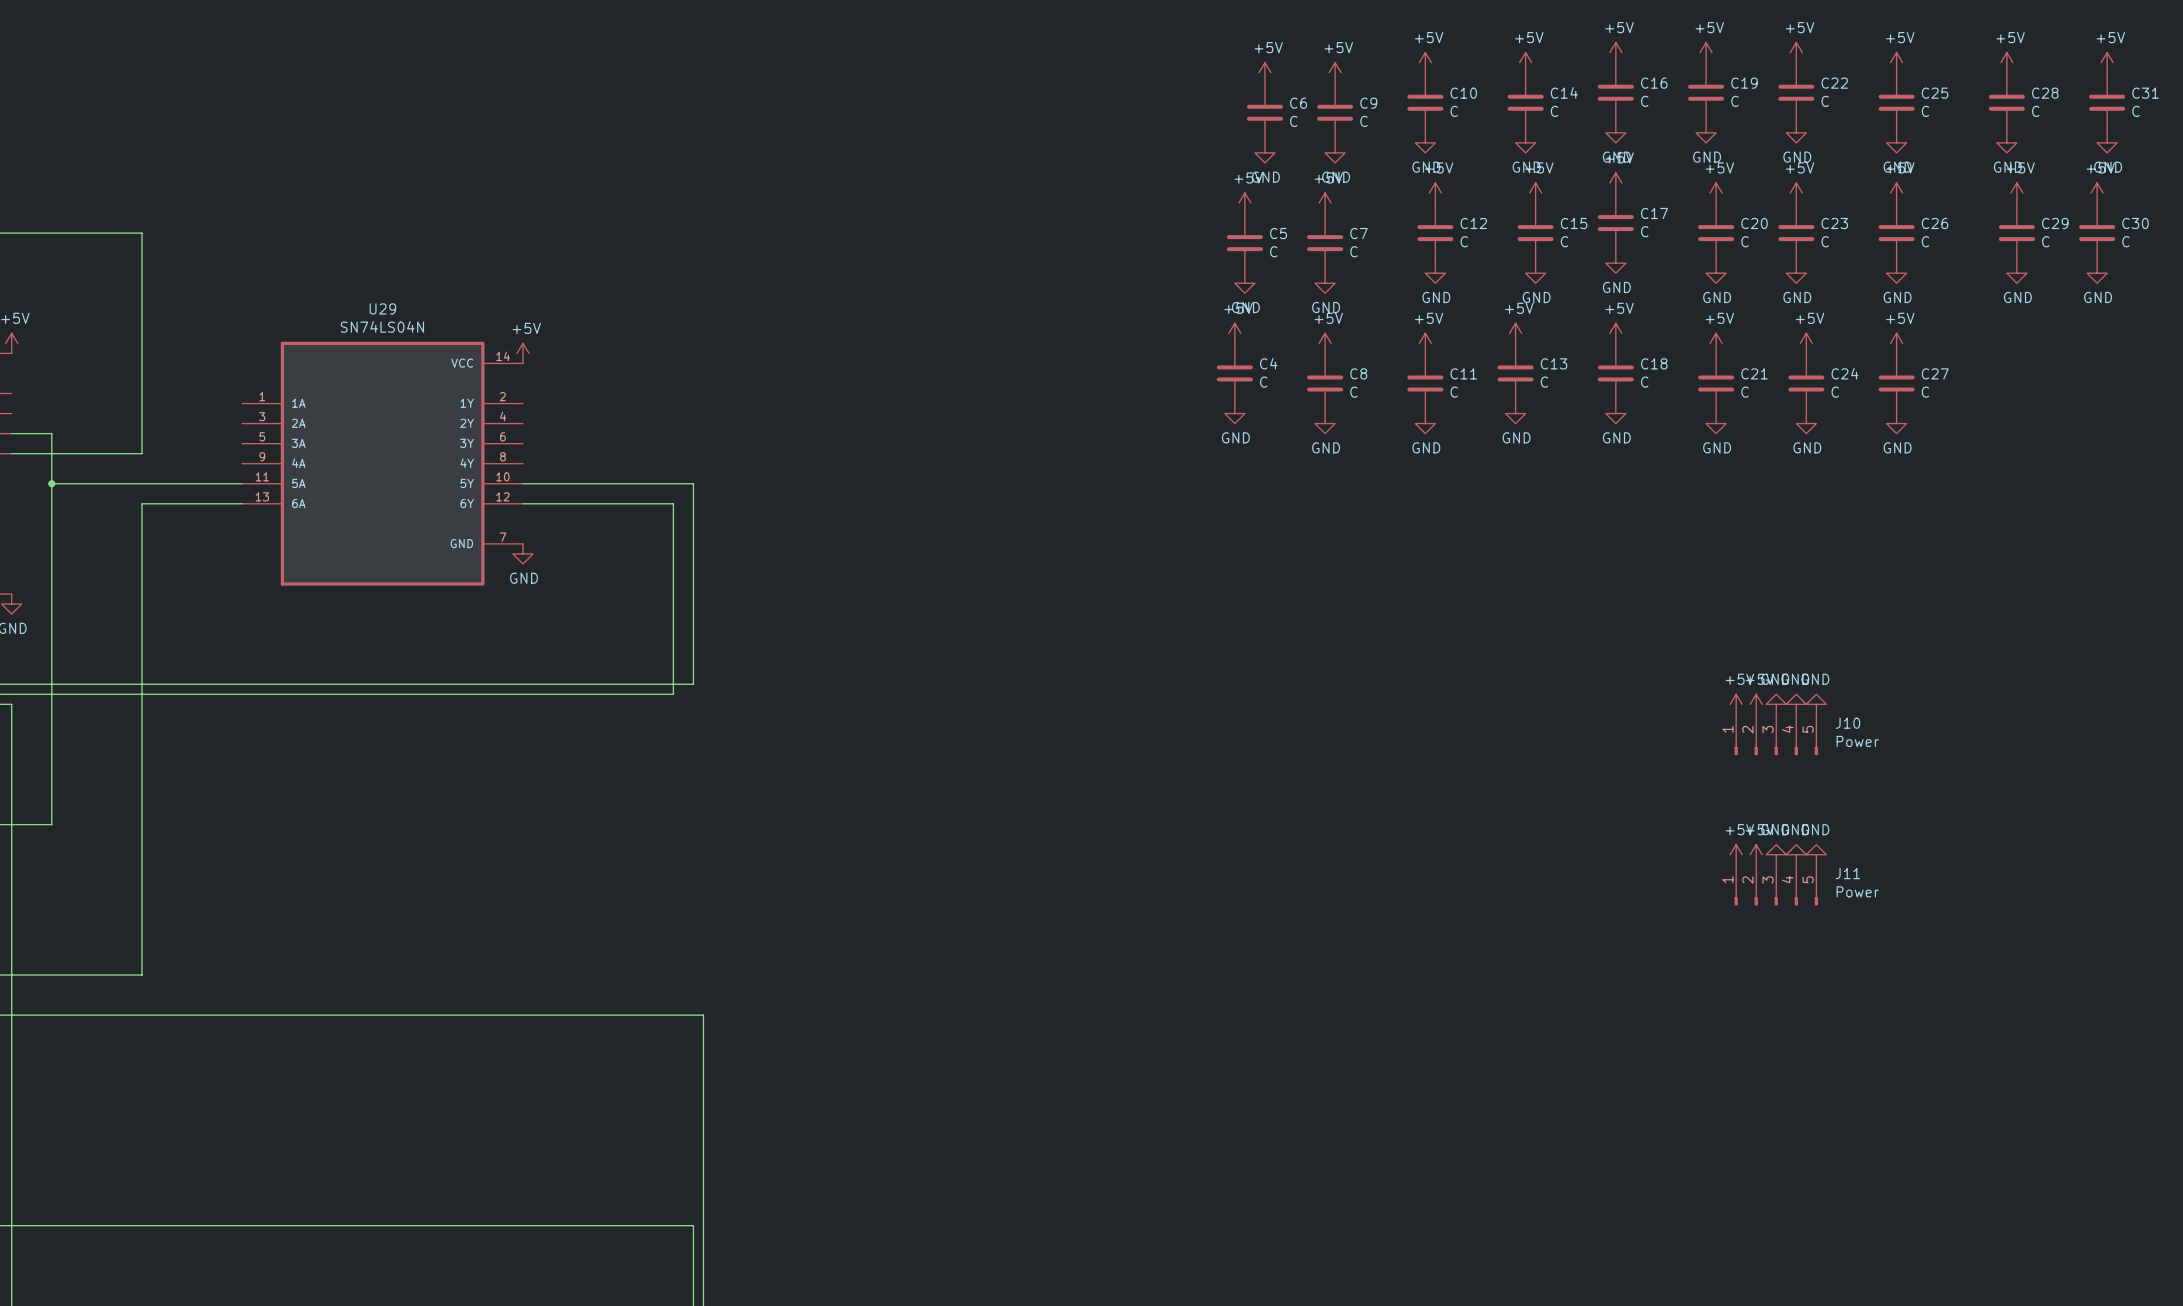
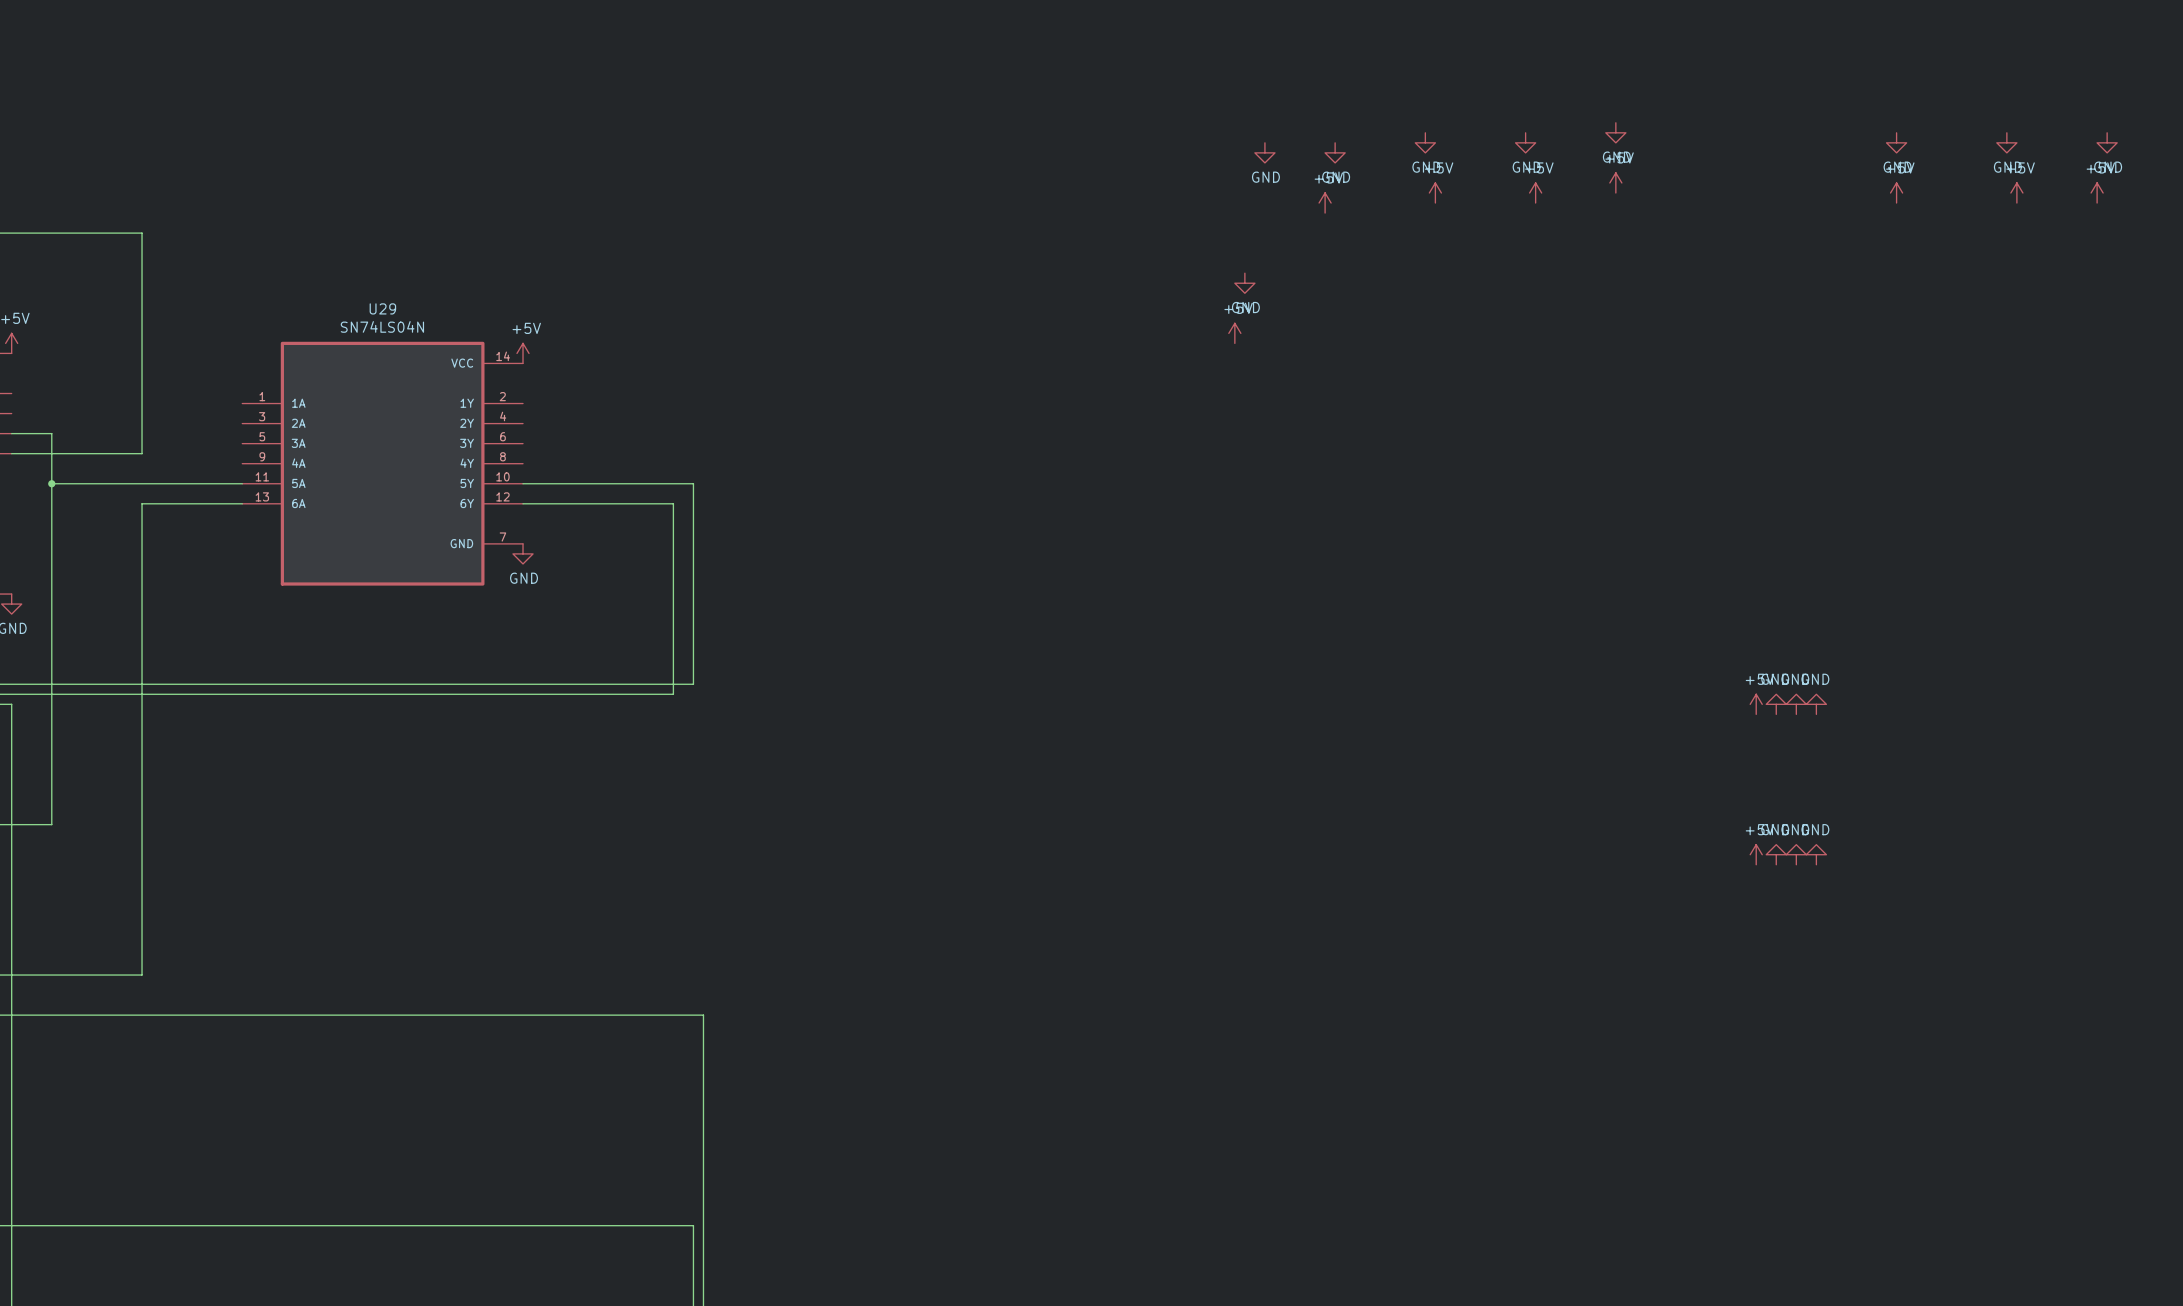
power symbol: +5V (1615, 52) -> none
power symbol: +5V (1706, 52) -> none
power symbol: +5V (1796, 52) -> none
power symbol: +5V (1425, 62) -> none
power symbol: +5V (1525, 62) -> none
power symbol: +5V (1896, 62) -> none
power symbol: +5V (2006, 62) -> none
power symbol: +5V (2107, 62) -> none
power symbol: +5V (1264, 72) -> none
power symbol: +5V (1335, 72) -> none
C16: C (1615, 92) -> none
C19: C (1706, 92) -> none
C22: C (1796, 92) -> none
C10: C (1425, 102) -> none
C14: C (1525, 102) -> none
C25: C (1896, 102) -> none
C28: C (2006, 102) -> none
C31: C (2107, 102) -> none
C6: C (1264, 112) -> none
C9: C (1335, 112) -> none
power symbol: GND (1706, 132) -> none
power symbol: GND (1796, 132) -> none
power symbol: +5V (1716, 192) -> none
power symbol: +5V (1796, 192) -> none
power symbol: +5V (1244, 203) -> none
C17: C (1615, 223) -> none
C12: C (1435, 233) -> none
C15: C (1535, 233) -> none
C20: C (1716, 233) -> none
C23: C (1796, 233) -> none
C26: C (1896, 233) -> none
C29: C (2016, 233) -> none
C30: C (2097, 233) -> none
C5: C (1244, 243) -> none
C7: C (1325, 243) -> none
power symbol: GND (1615, 263) -> none
power symbol: GND (1435, 273) -> none
power symbol: GND (1535, 273) -> none
power symbol: GND (1716, 273) -> none
power symbol: GND (1796, 273) -> none
power symbol: GND (1896, 273) -> none
power symbol: GND (2016, 273) -> none
power symbol: GND (2097, 273) -> none
power symbol: GND (1325, 283) -> none
power symbol: +5V (1515, 333) -> none
power symbol: +5V (1615, 333) -> none
power symbol: +5V (1325, 343) -> none
power symbol: +5V (1425, 343) -> none
power symbol: +5V (1716, 343) -> none
power symbol: +5V (1806, 343) -> none
power symbol: +5V (1896, 343) -> none
C4: C (1234, 373) -> none
C13: C (1515, 373) -> none
C18: C (1615, 373) -> none
C8: C (1325, 383) -> none
C11: C (1425, 383) -> none
C21: C (1716, 383) -> none
C24: C (1806, 383) -> none
C27: C (1896, 383) -> none
power symbol: GND (1234, 413) -> none
power symbol: GND (1515, 413) -> none
power symbol: GND (1615, 413) -> none
power symbol: GND (1325, 423) -> none
power symbol: GND (1425, 423) -> none
power symbol: GND (1716, 423) -> none
power symbol: GND (1806, 423) -> none
power symbol: GND (1896, 423) -> none
power symbol: +5V (1736, 704) -> none
J10: Power (1776, 734) -> none
power symbol: +5V (1736, 854) -> none
J11: Power (1776, 885) -> none

